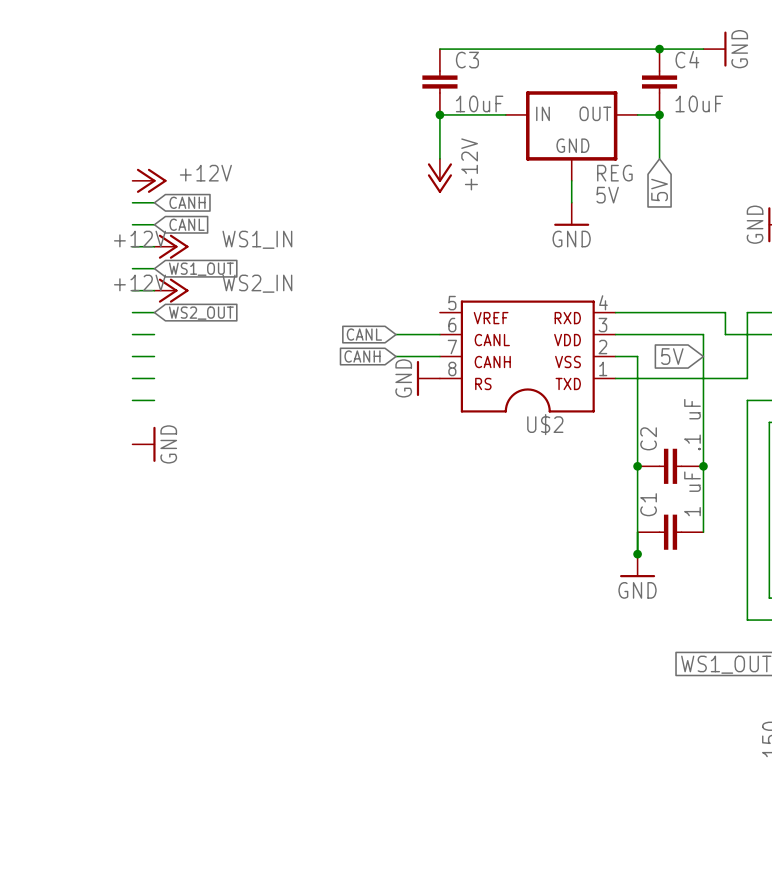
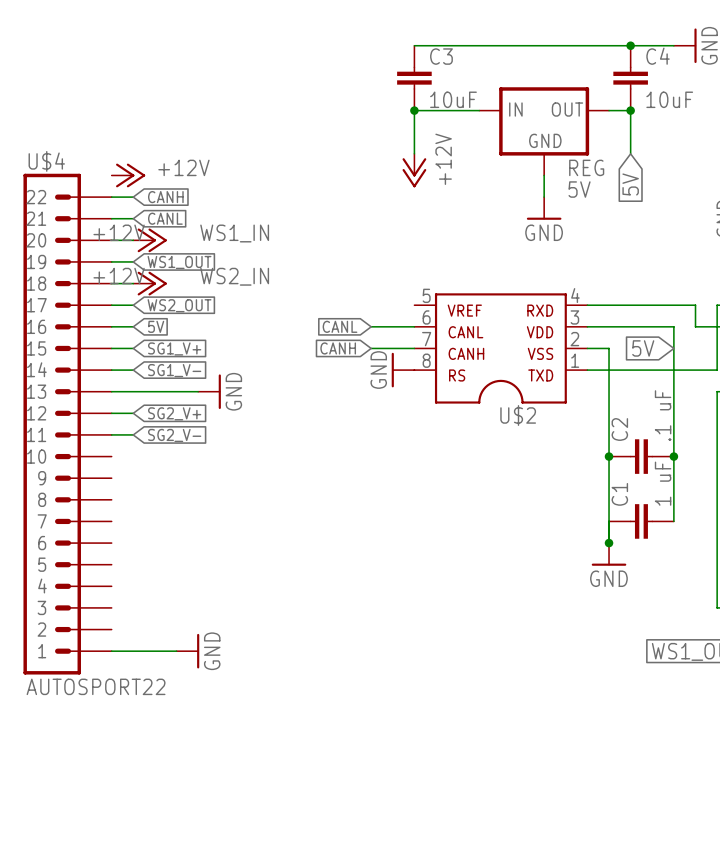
global label: none -> 5V (156, 326)
global label: none -> SG1_V+ (174, 348)
global label: none -> SG1_V- (174, 370)
wire: none -> (133, 391) (198, 391)
wire: none -> (111, 413) (133, 413)
global label: none -> SG2_V+ (174, 413)
U$4: none -> AUTOSPORT22 (67, 424)
power symbol position: GND (144, 444) -> GND (209, 391)
global label: none -> SG2_V- (174, 435)
wire: none -> (111, 651) (176, 651)
power symbol: none -> GND (187, 651)

